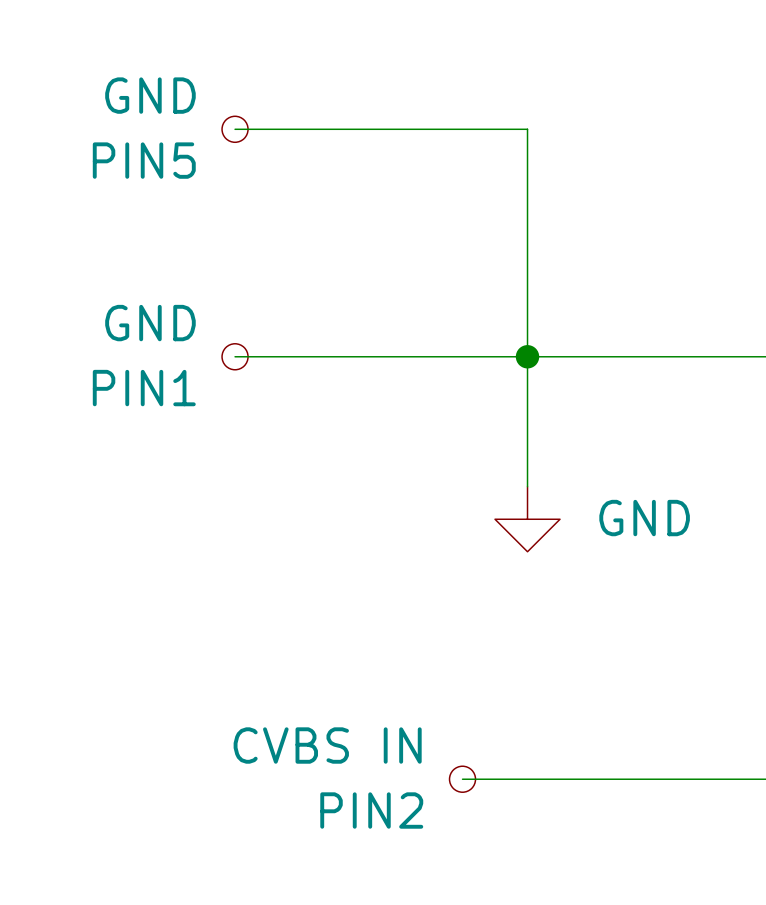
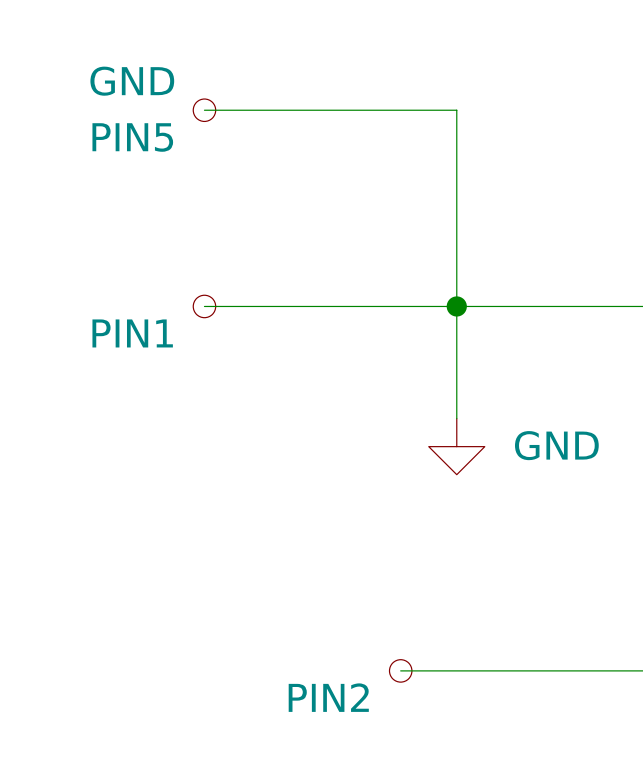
PIN1 value: GND (150, 323) -> none
PIN2 value: CVBS IN (327, 745) -> none

